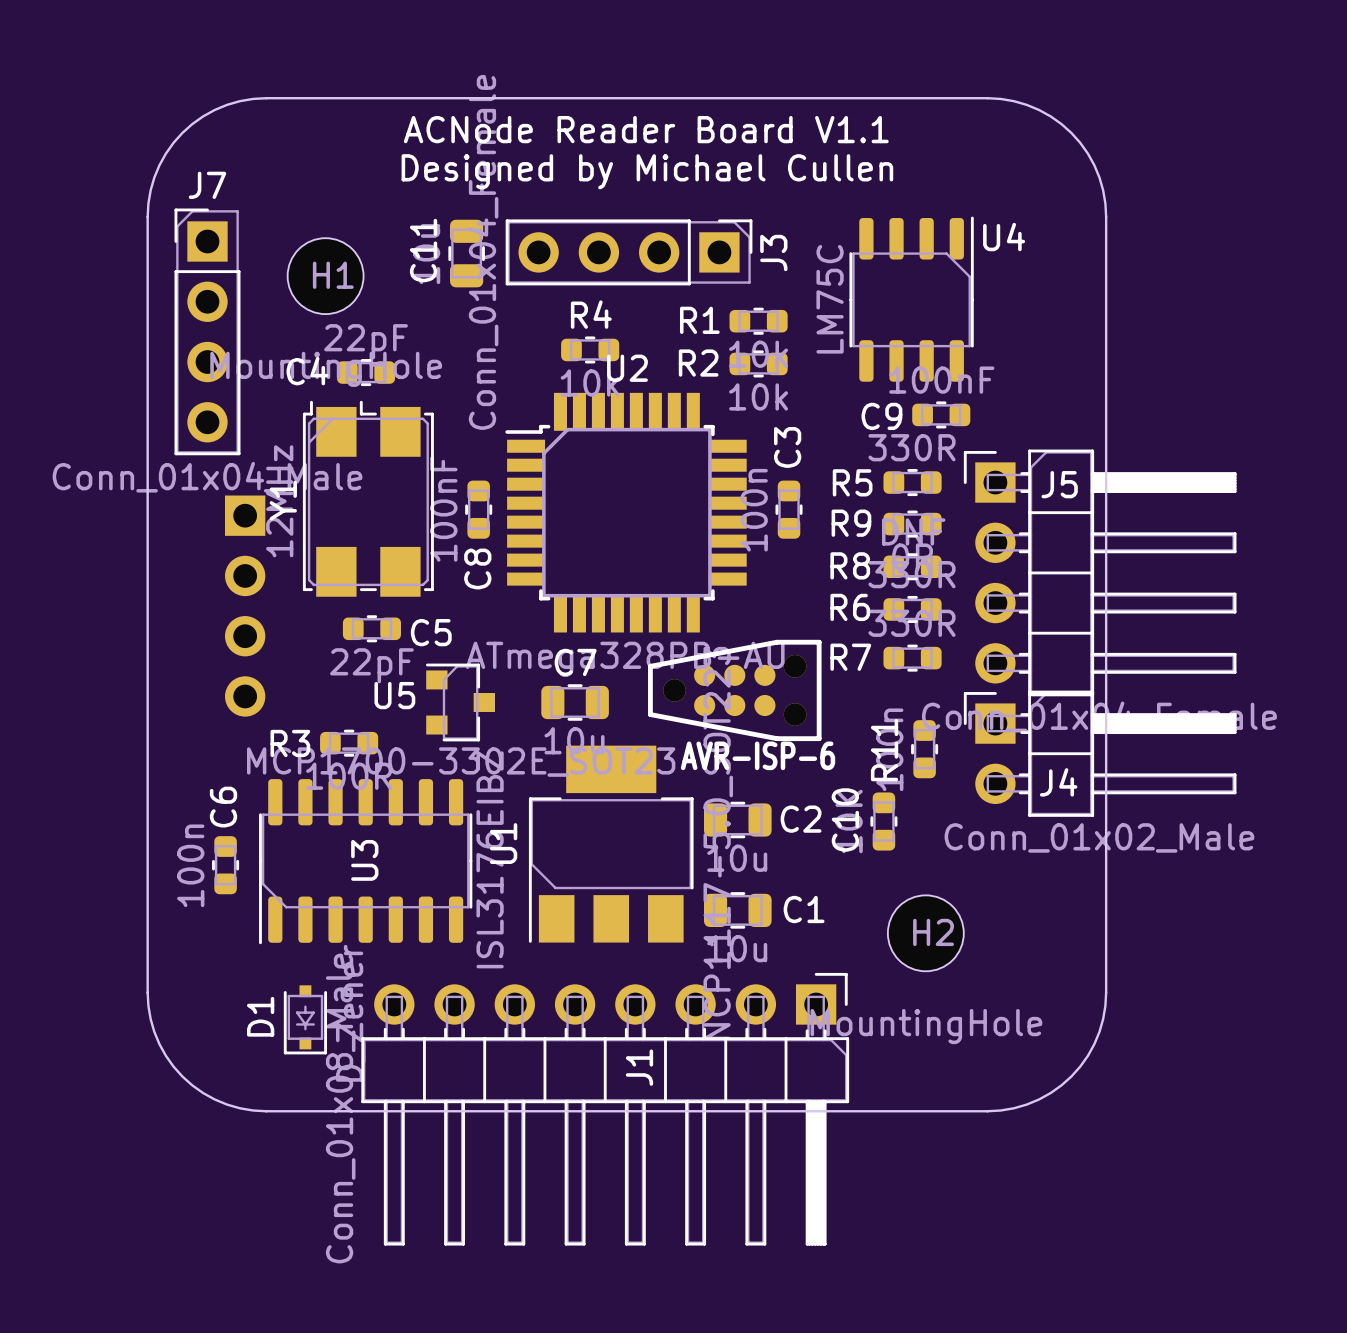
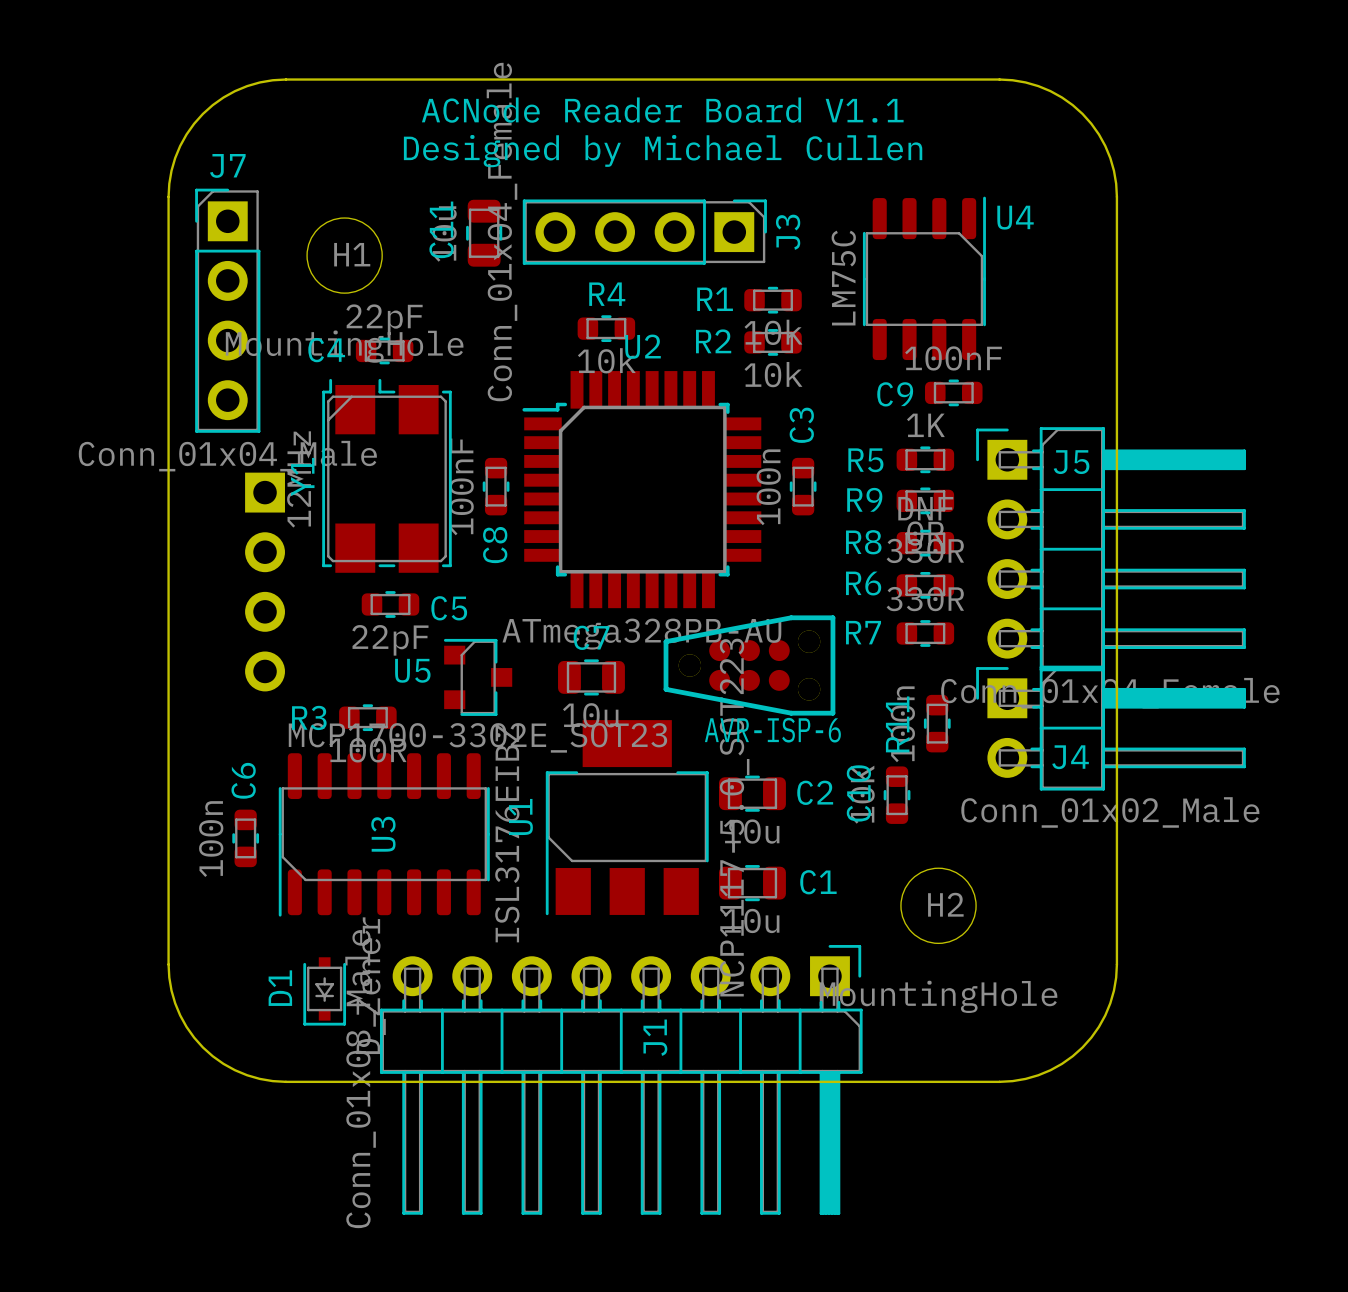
R5 value: 330R (911, 447) -> 1K (925, 425)

